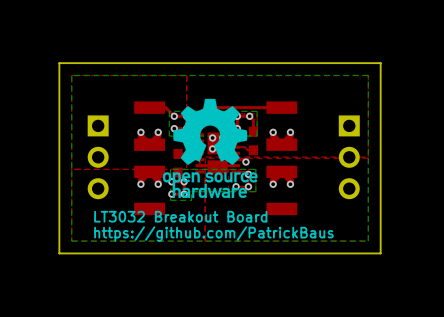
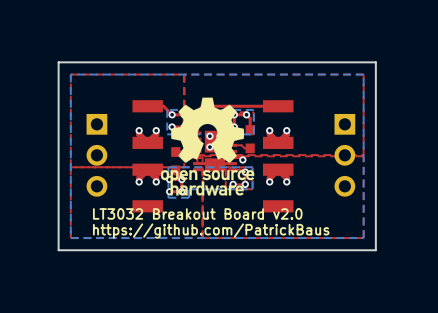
text: LT3032 Breakout Board (180, 216) -> LT3032 Breakout Board v2.0 (197, 213)

